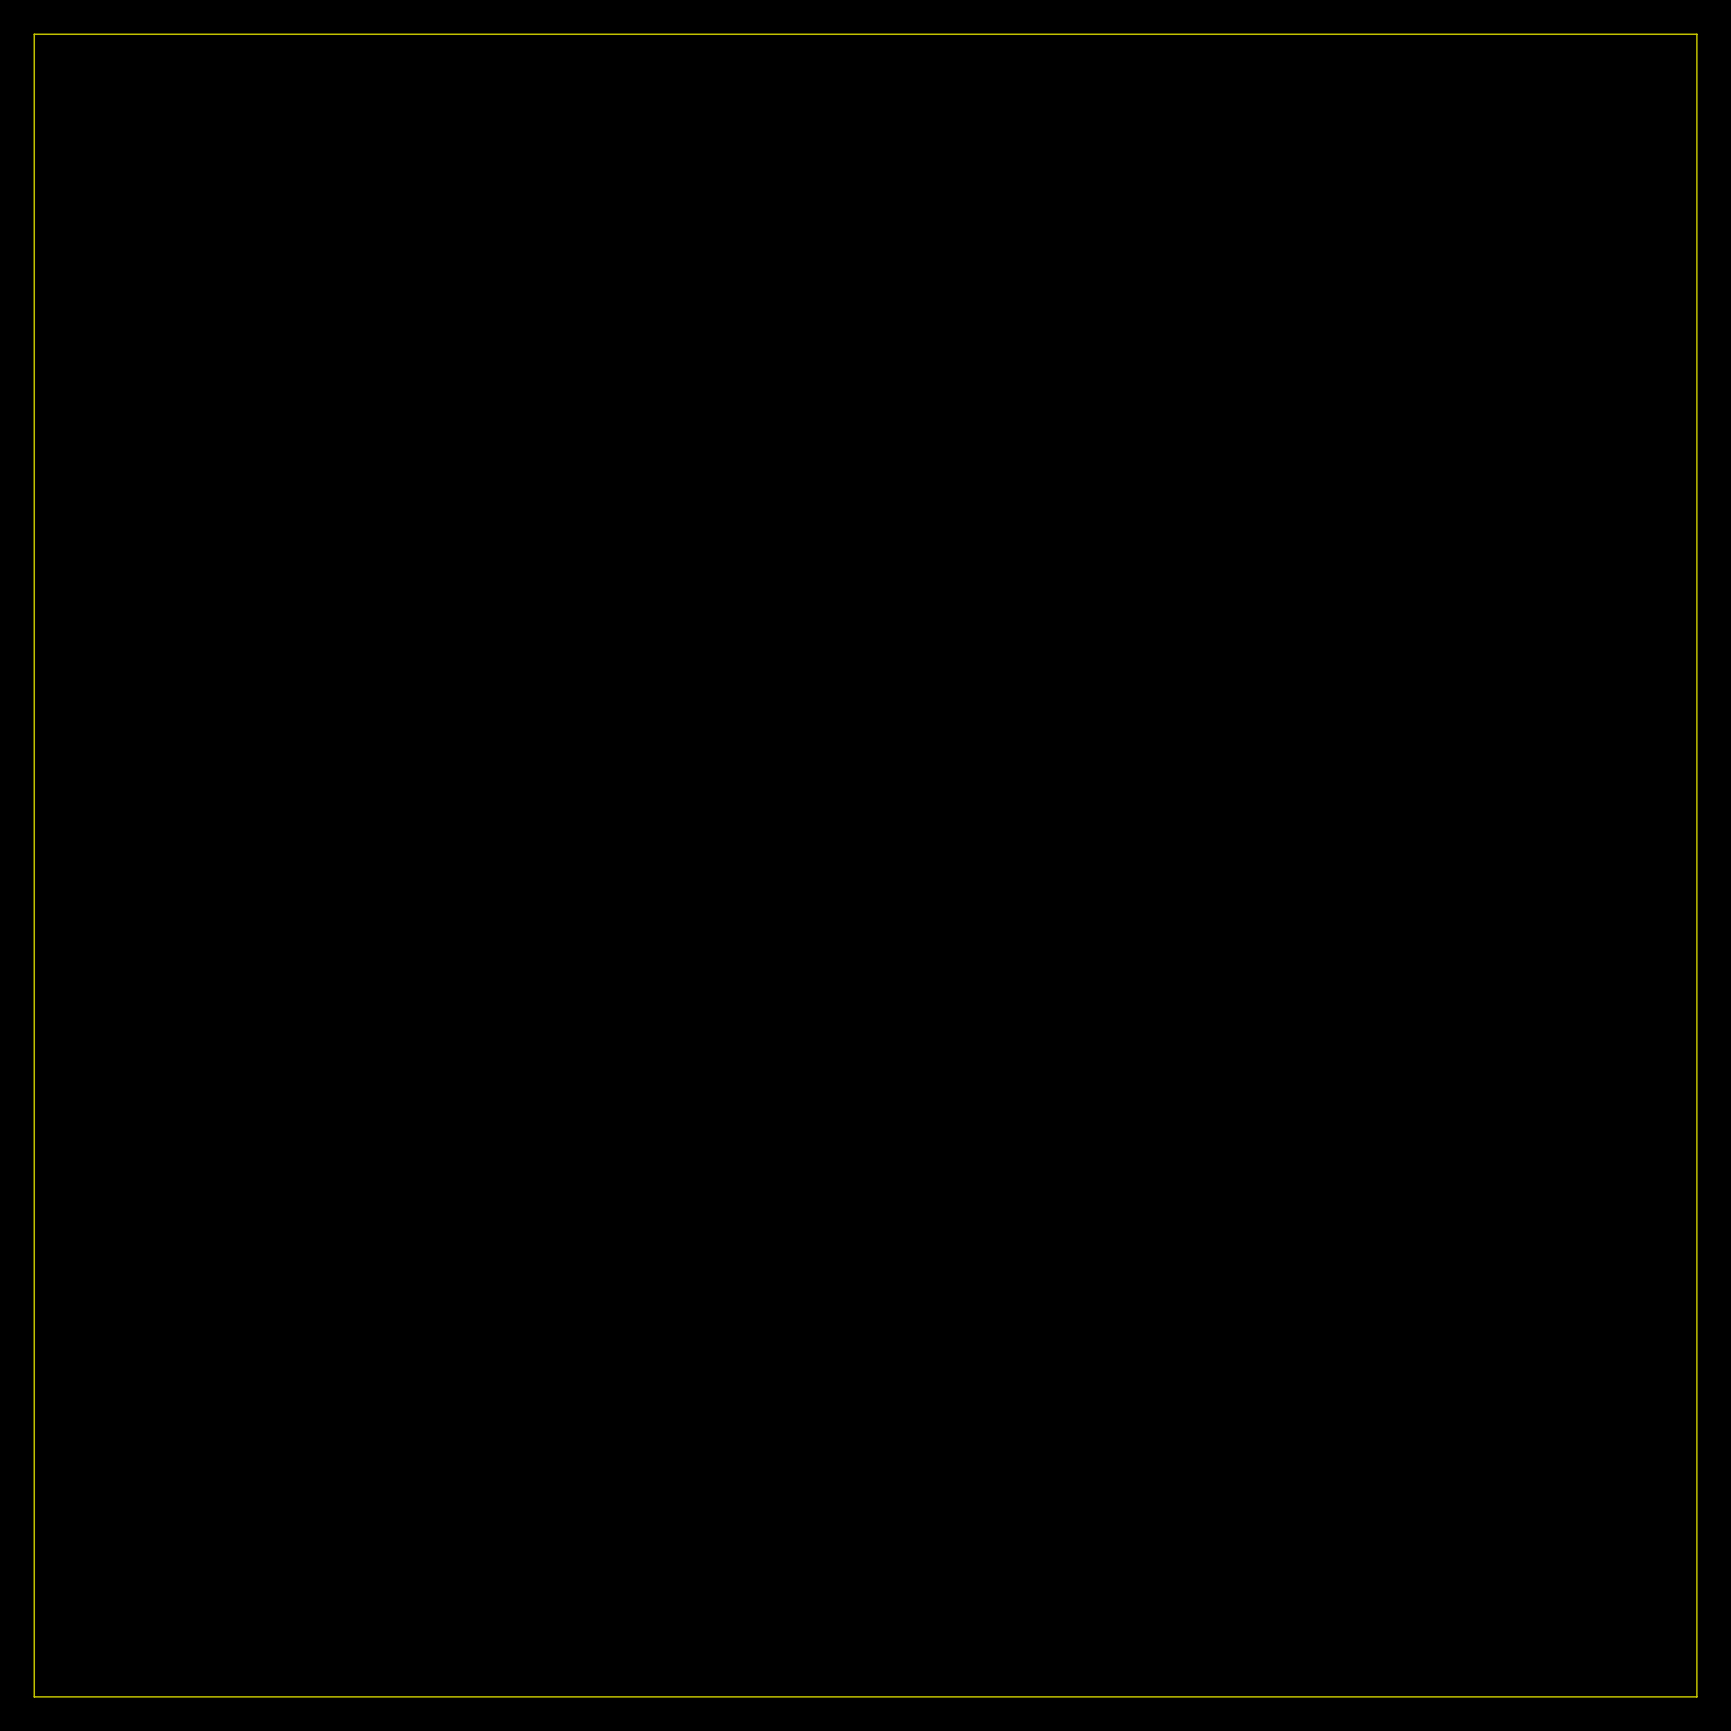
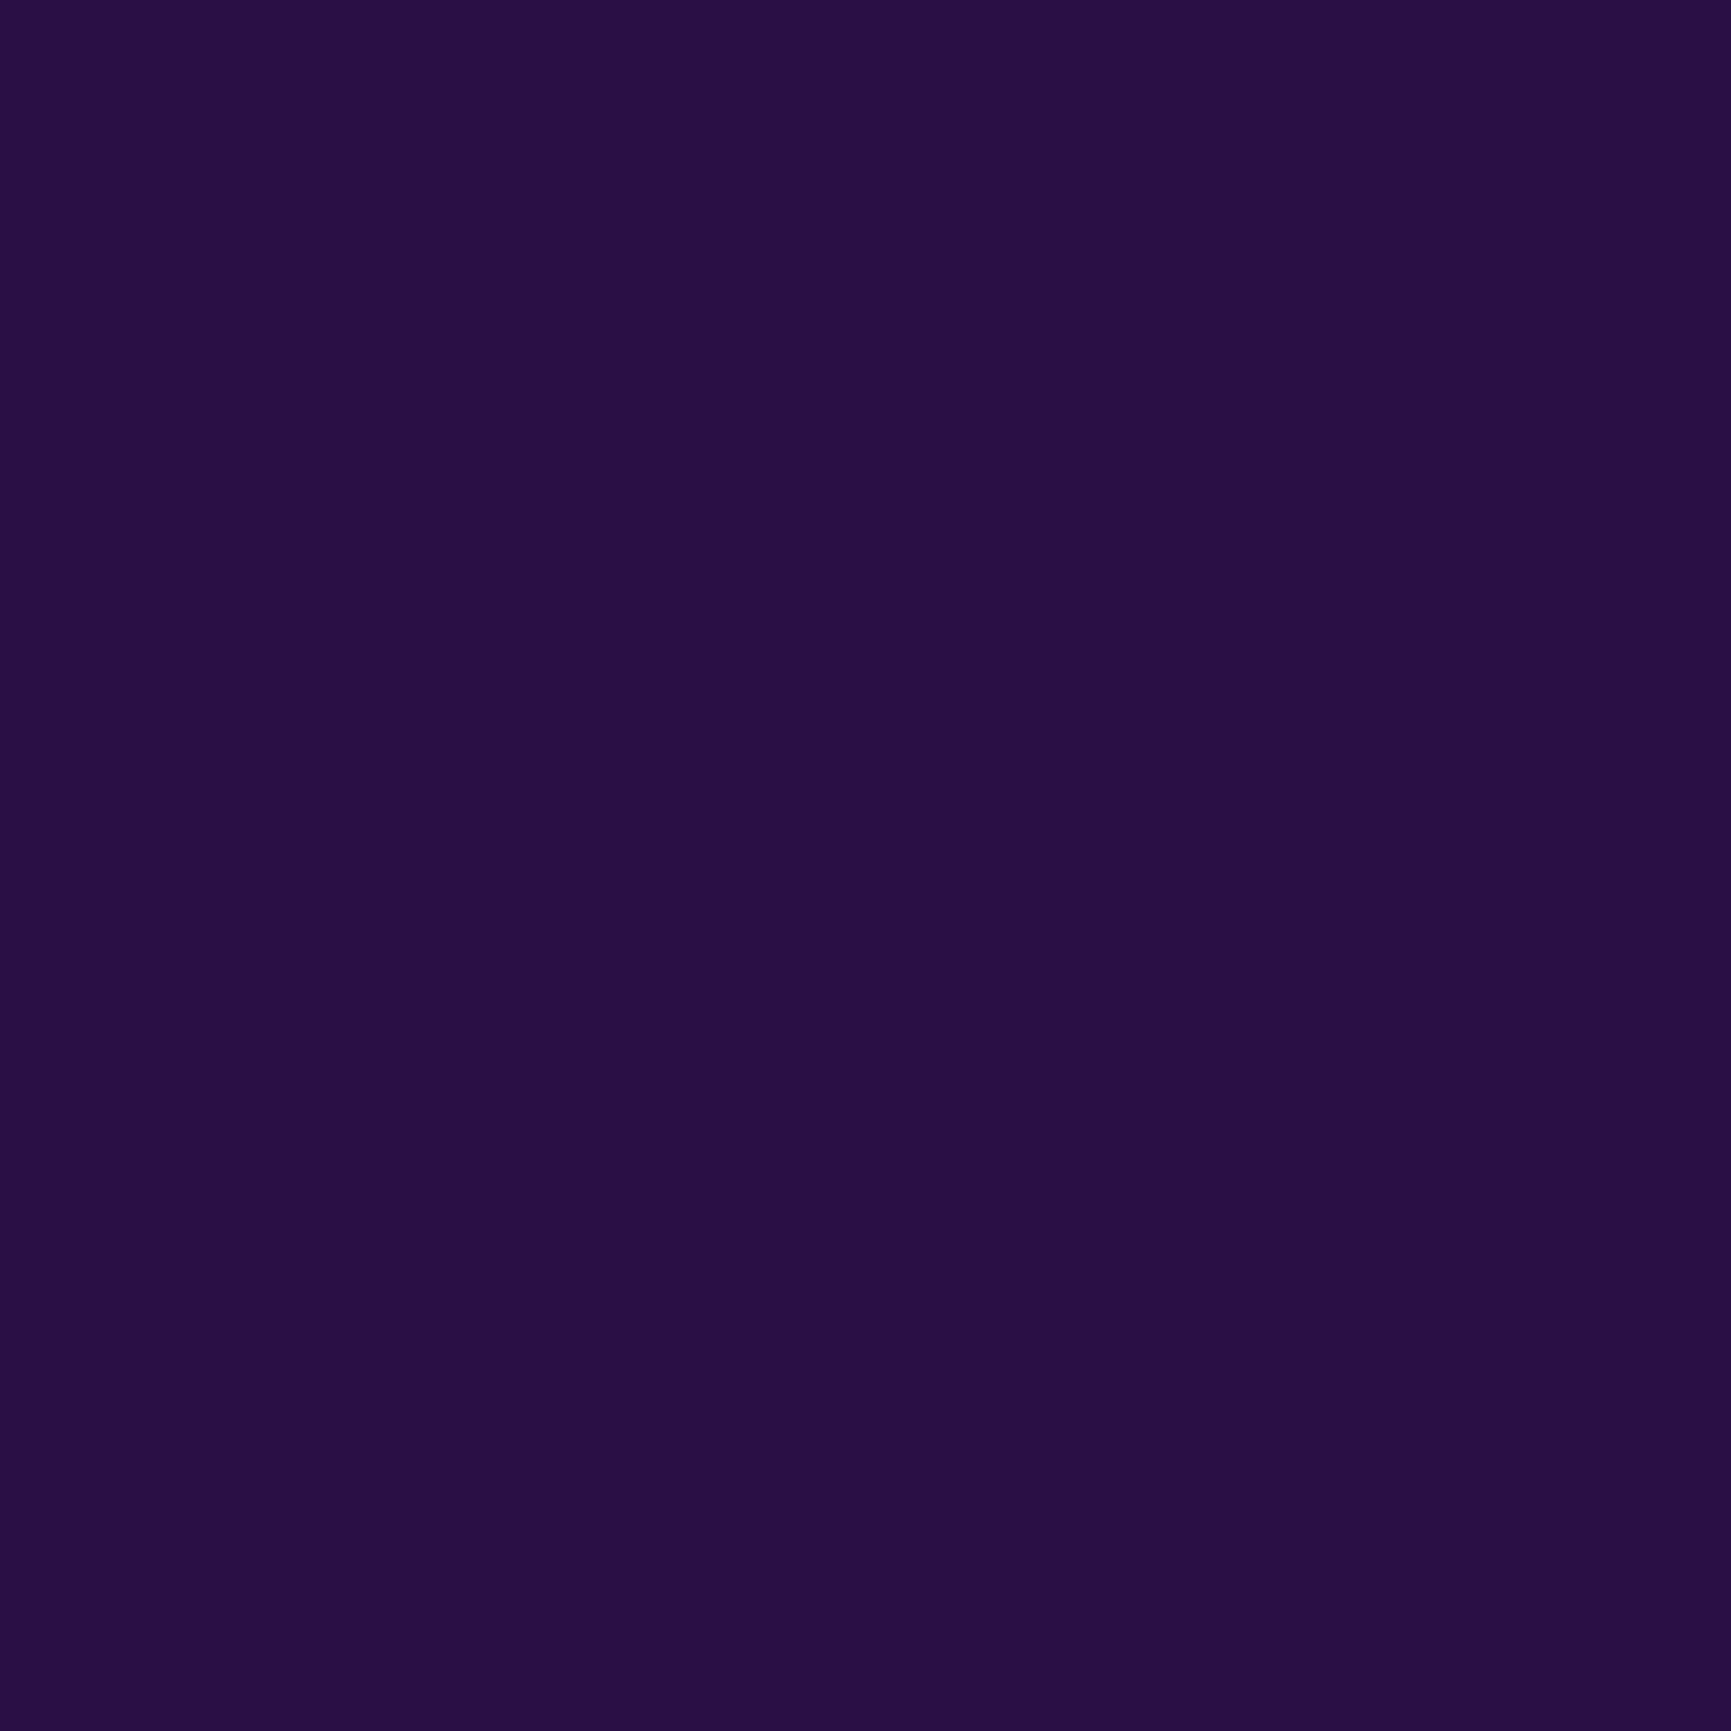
board edge: (34, 34) (1696, 34) (1696, 1696) (34, 1696) (34, 34) -> none

